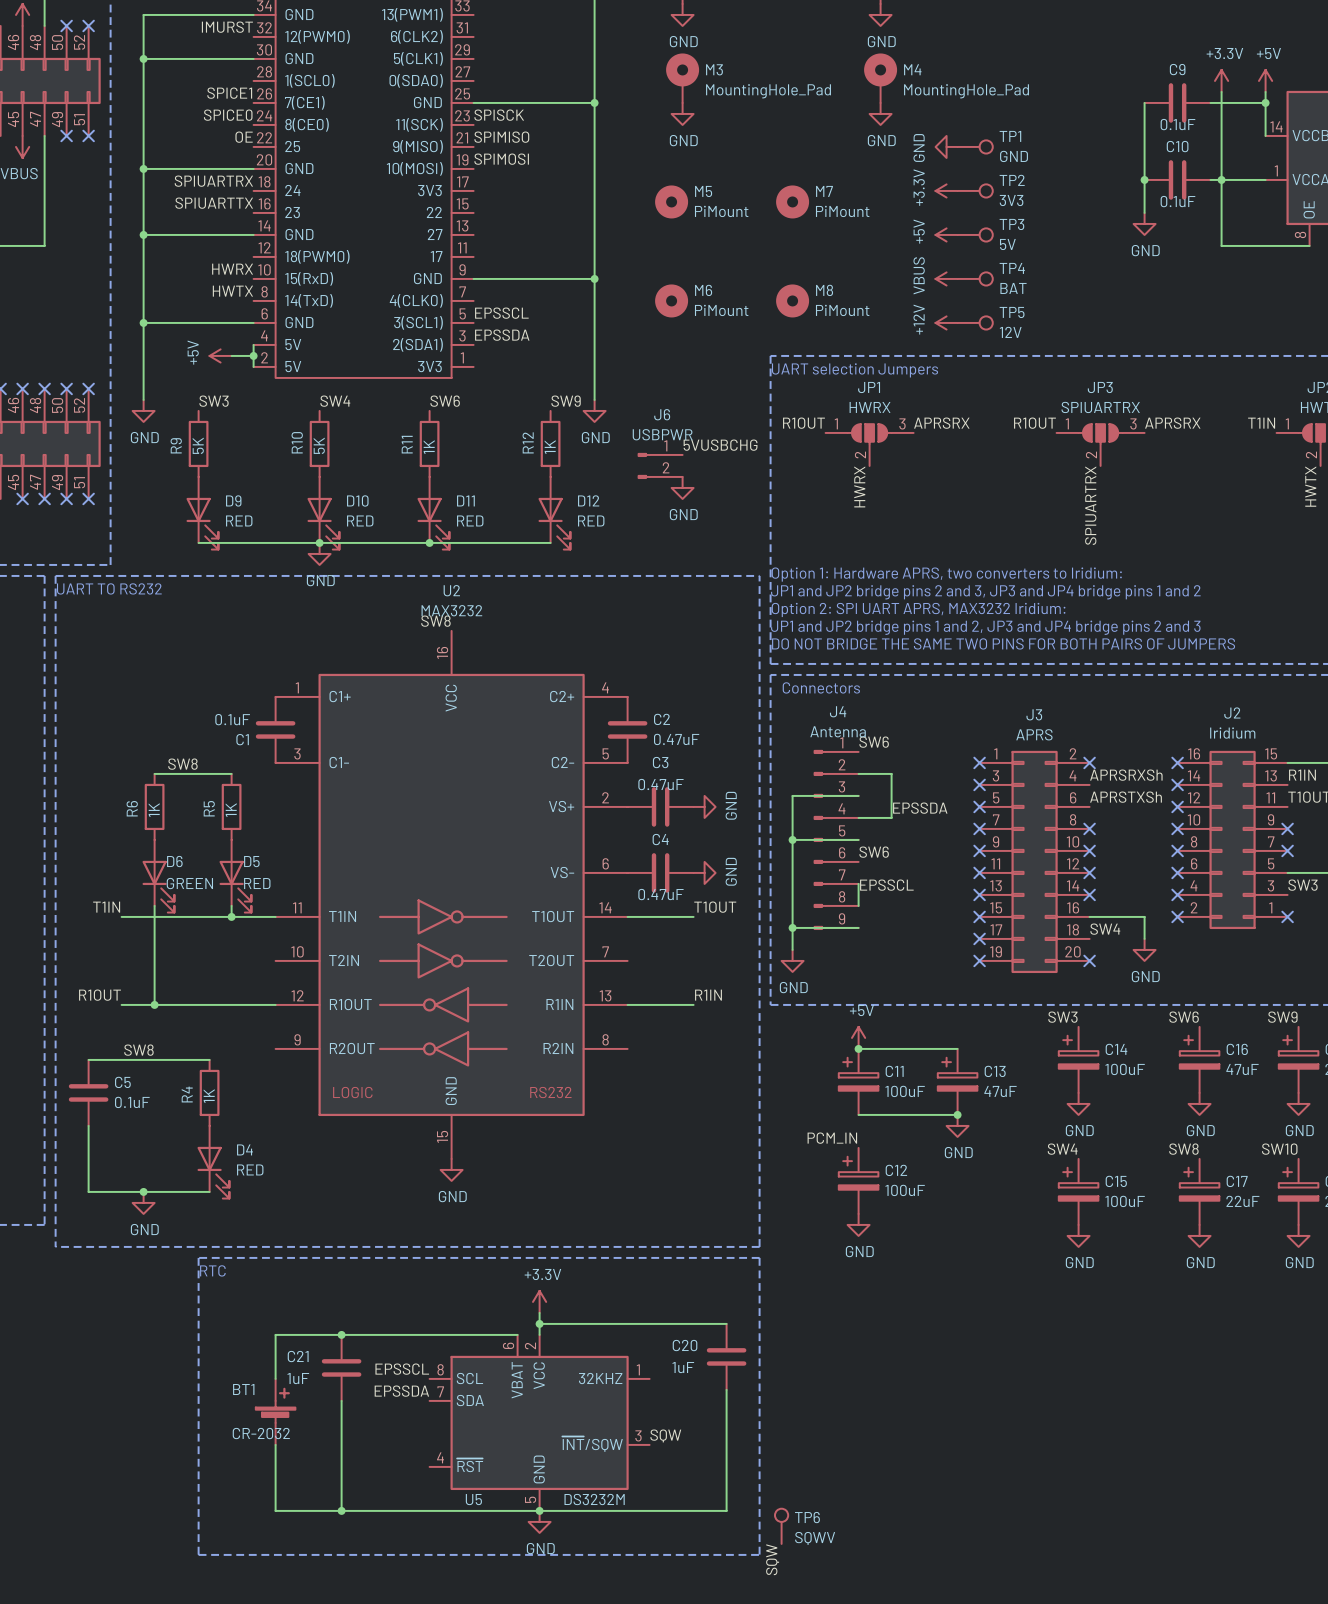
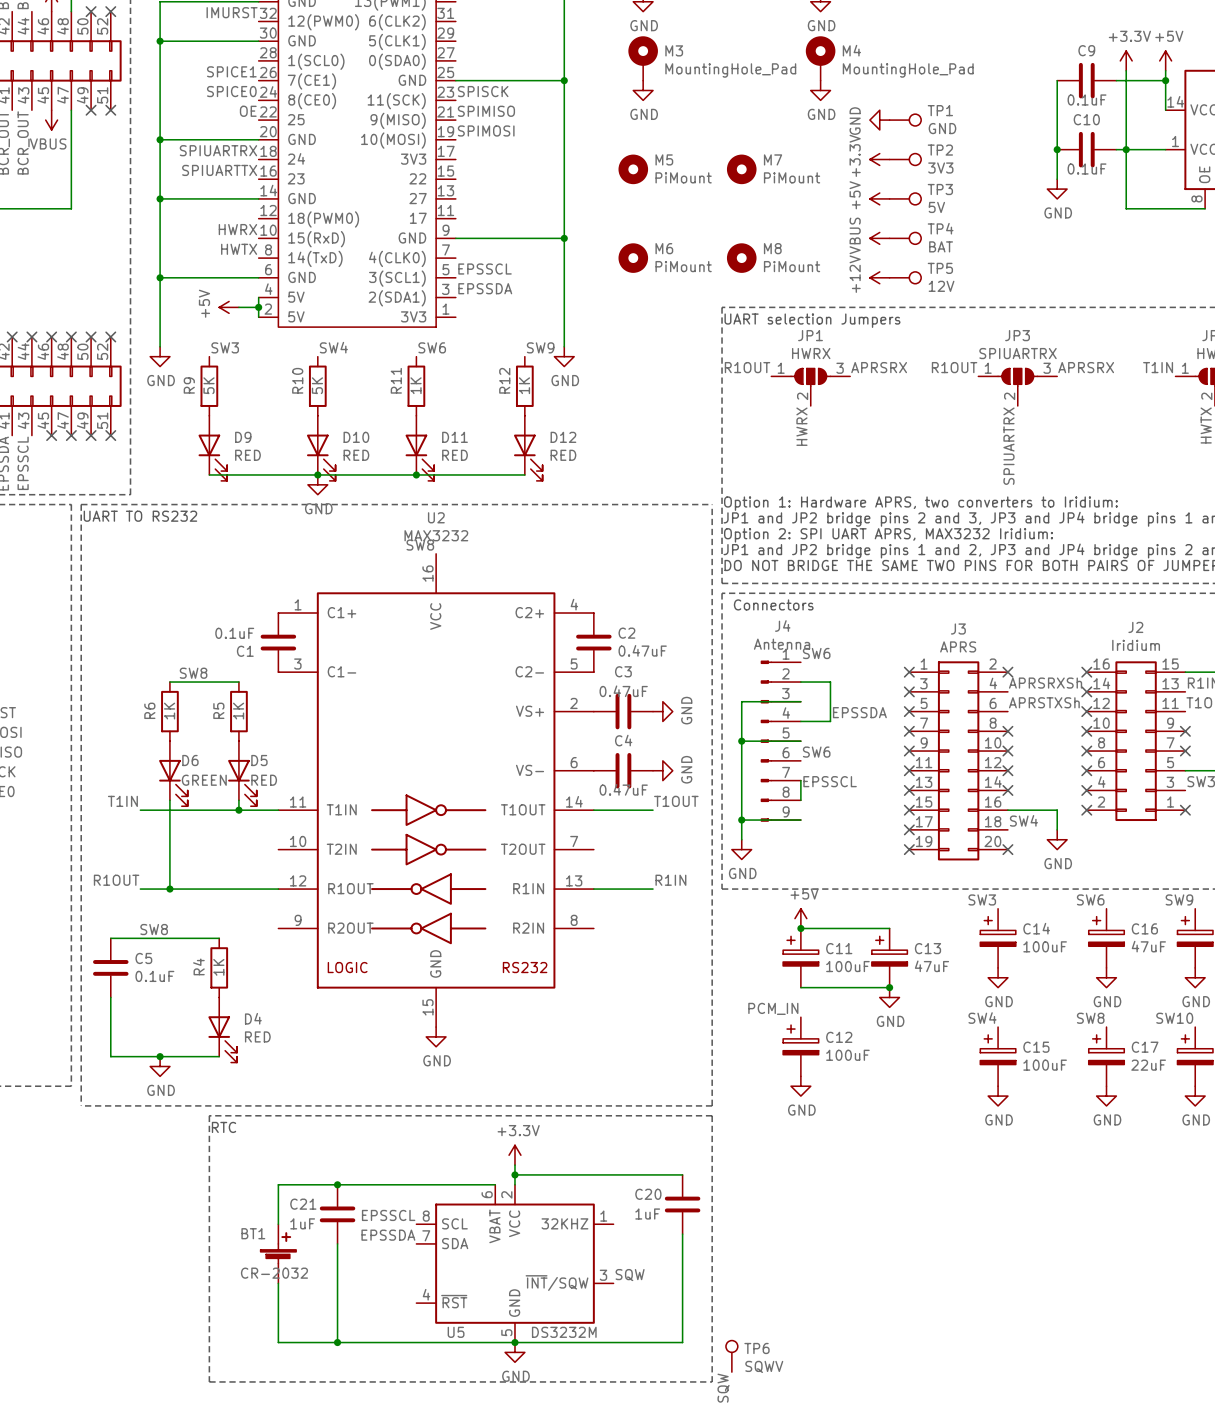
label: 5VUSBCHG (720, 445) -> none
J6: USBPWR (660, 465) -> none
power symbol: GND (682, 487) -> none

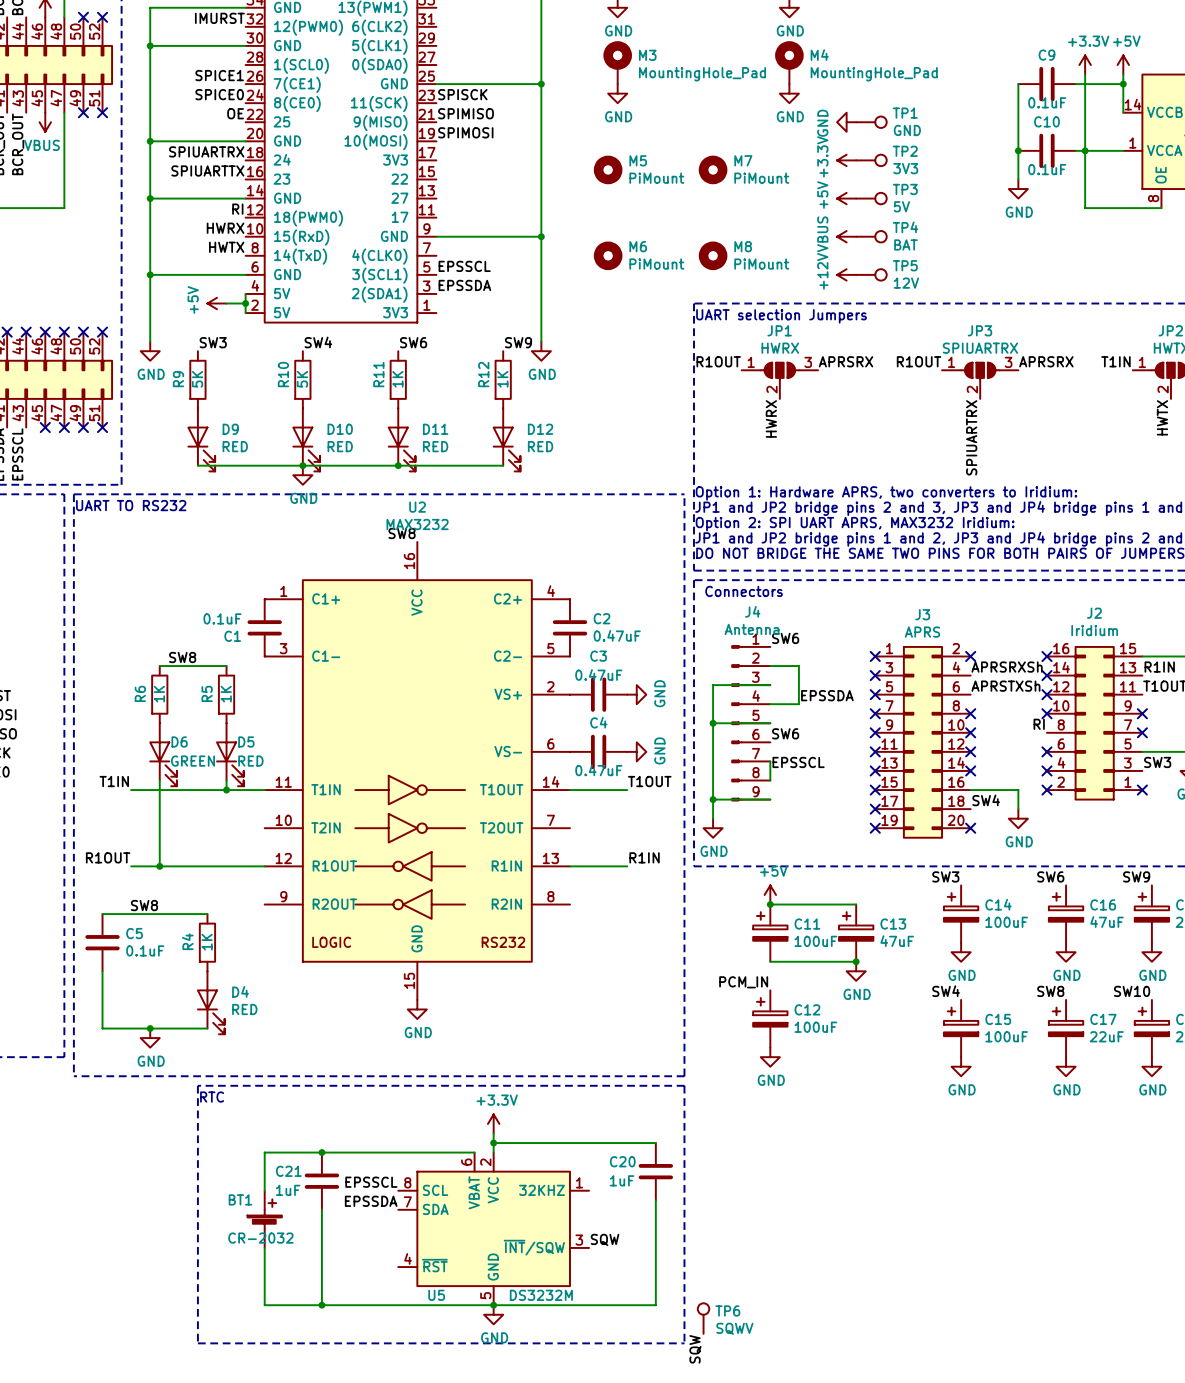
label: none -> RI (237, 209)
label: none -> RI (1039, 724)
no-connect mark: (1086, 751) -> none

